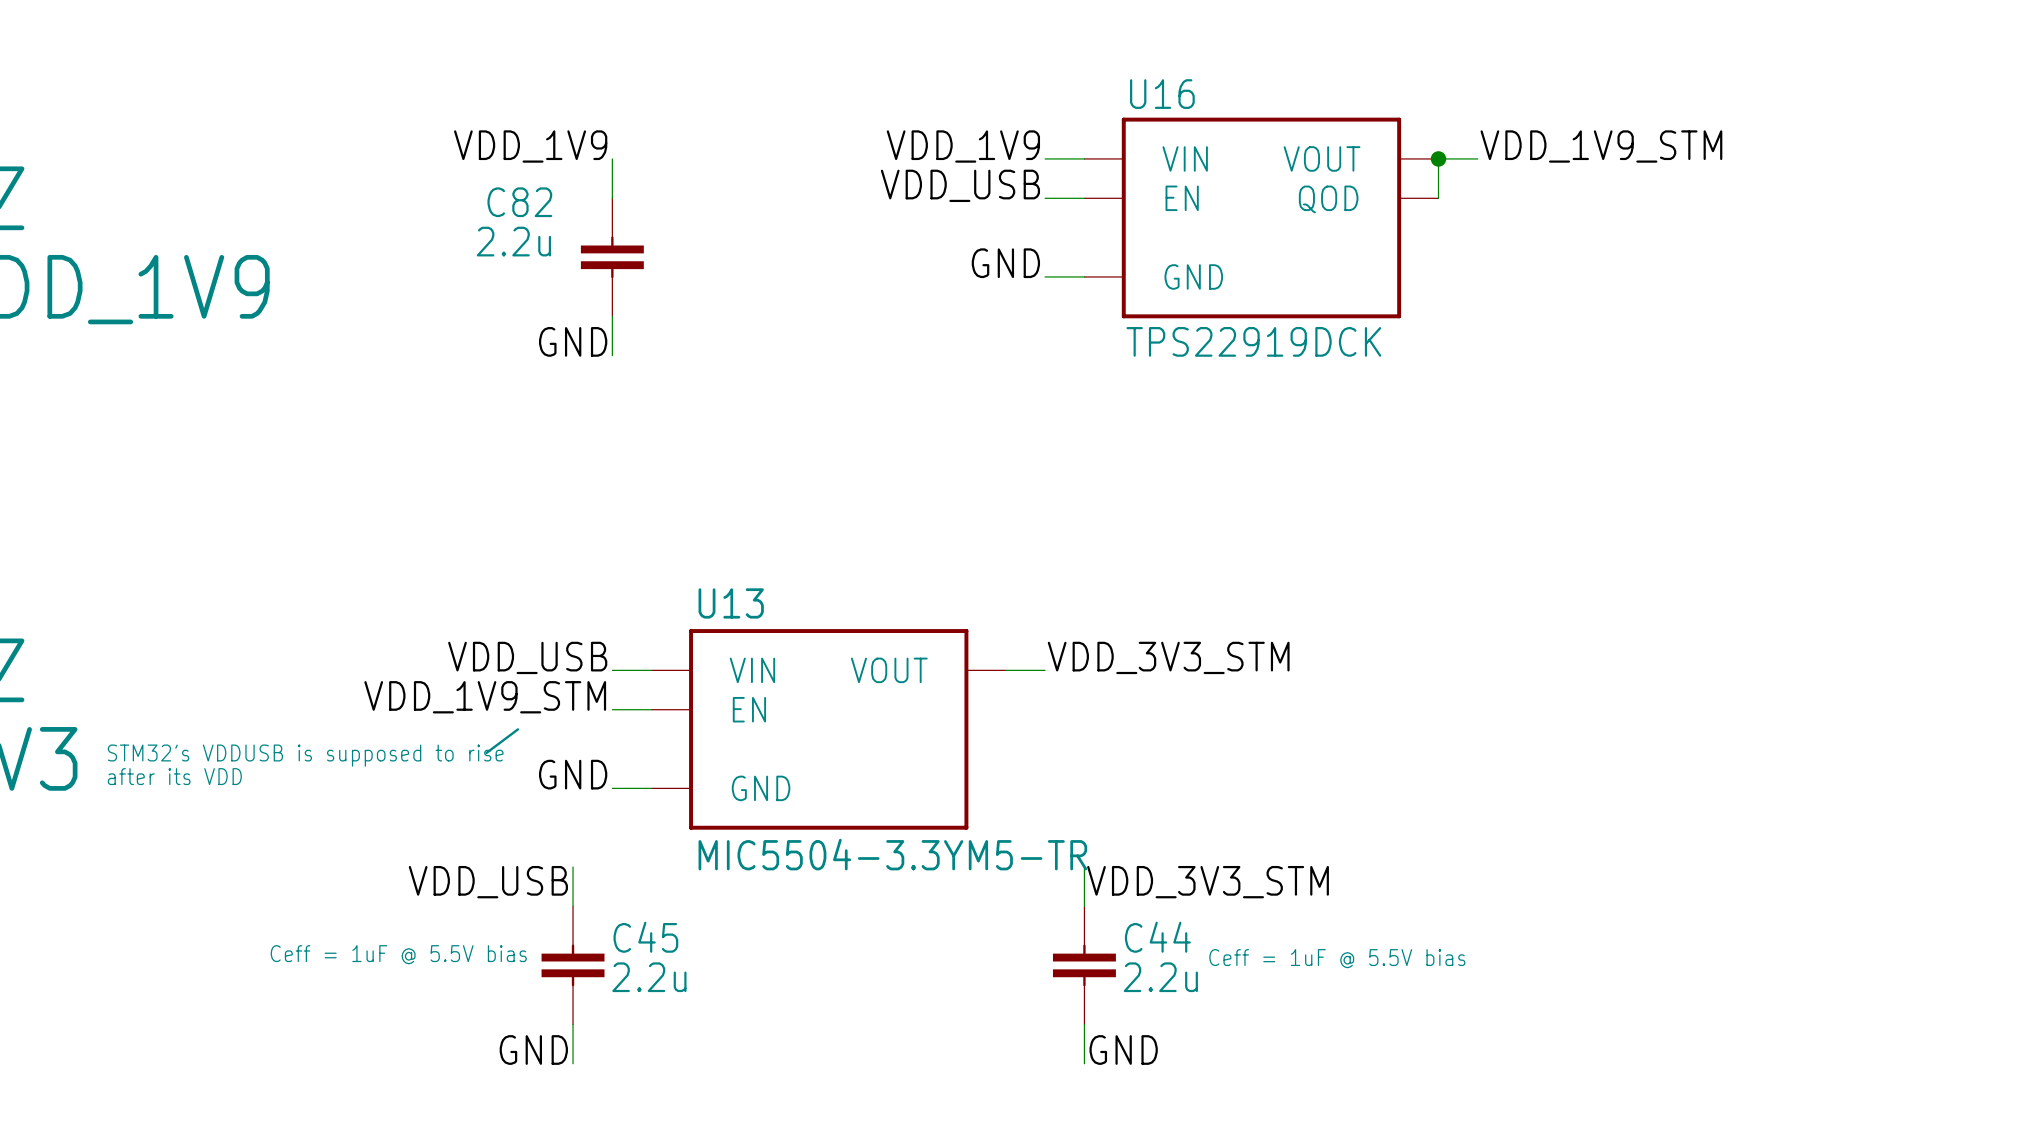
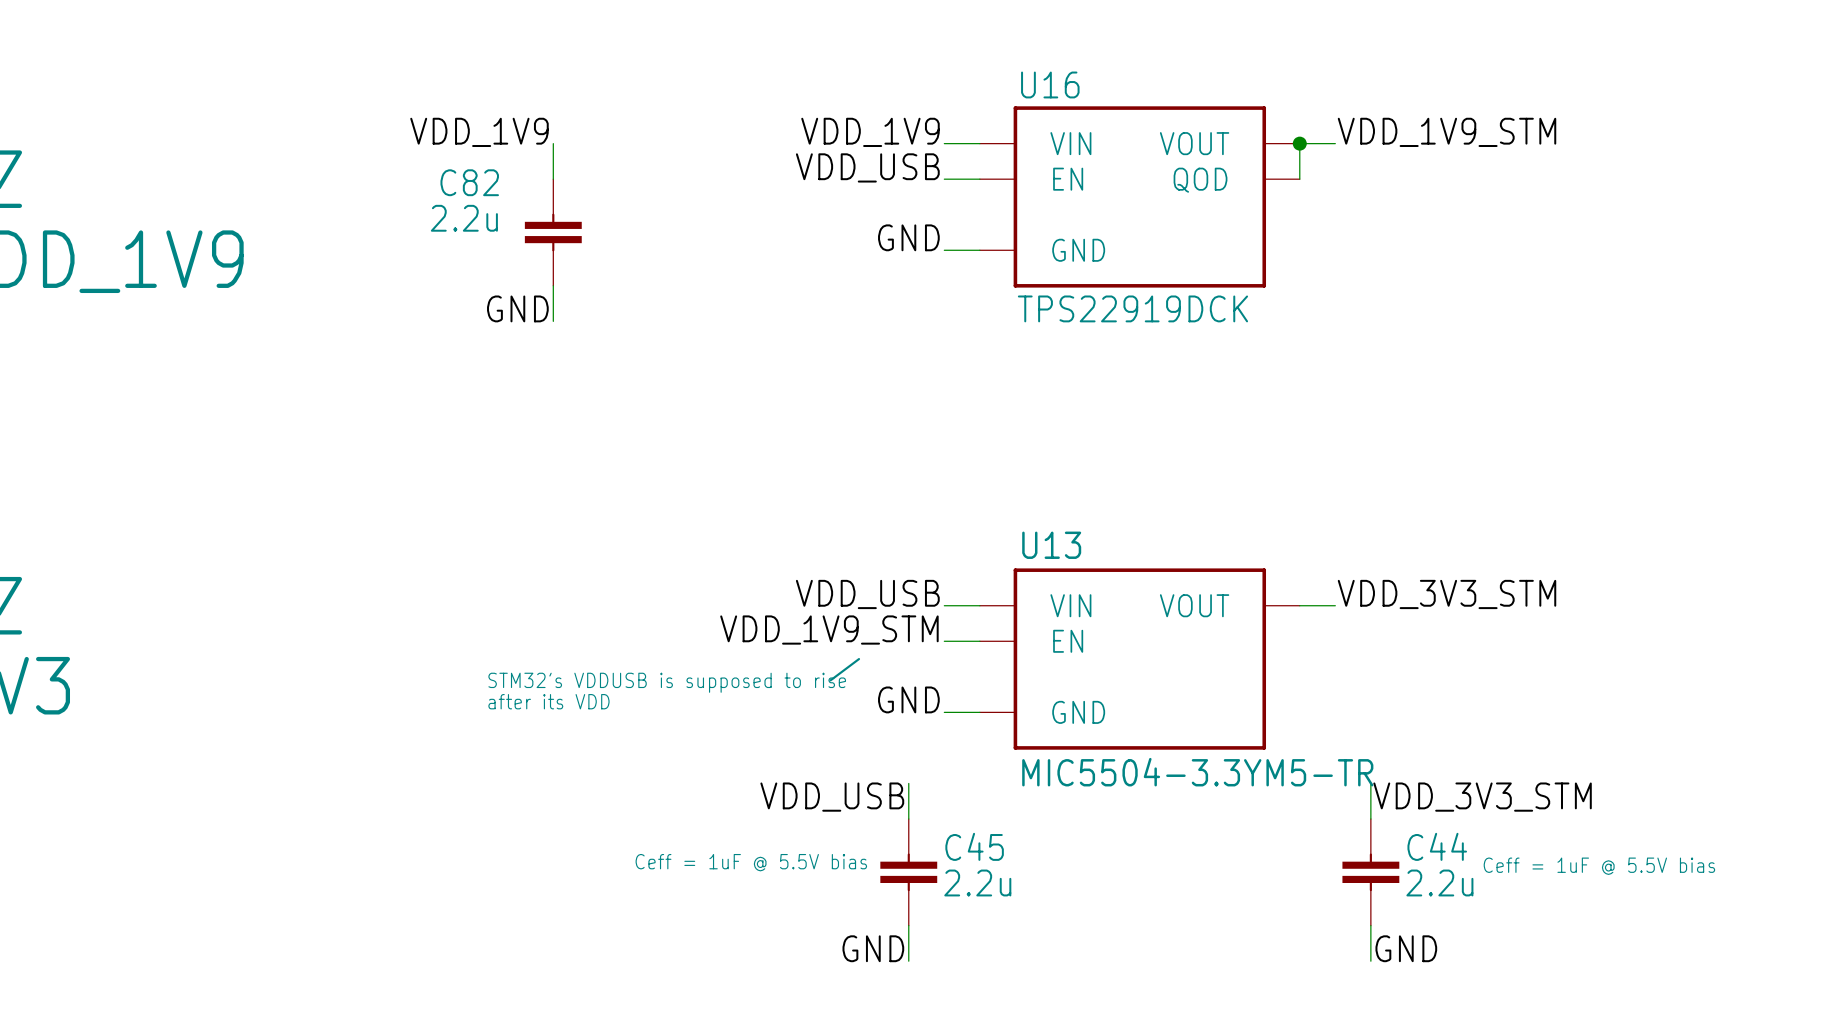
label: VDD_USB (527, 657) -> none
label: VDD_3V3_STM (1168, 657) -> VDD_USB (867, 594)
label: none -> VDD_3V3_STM (1447, 594)
wire: (612, 670) (651, 670) -> none
wire: (1005, 670) (1045, 670) -> (979, 605) (944, 605)
wire: none -> (1299, 605) (1335, 605)
label: VDD_1V9_STM (485, 697) -> none
label: none -> VDD_1V9_STM (829, 630)
wire: (612, 709) (651, 709) -> none
wire: none -> (944, 641) (979, 641)
line: (517, 729) (486, 752) -> none
U13 position: (828, 729) -> (1139, 659)
line: none -> (859, 659) (830, 680)
text: STM32's VDDUSB is supposed to rise (305, 755) -> none
text: none -> STM32's VDDUSB is supposed to rise (667, 682)
label: GND (573, 774) -> none
label: none -> GND (908, 699)
text: after its VDD (174, 776) -> none
text: none -> after its VDD (548, 701)
wire: (612, 788) (651, 788) -> none
wire: none -> (944, 712) (979, 712)
wire: (573, 867) (573, 906) -> none
wire: (1084, 867) (1084, 906) -> (908, 783) (908, 819)
wire: none -> (1370, 783) (1370, 819)
label: VDD_USB (488, 882) -> none
label: none -> VDD_USB (832, 797)
label: VDD_3V3_STM (1208, 882) -> none
label: none -> VDD_3V3_STM (1482, 797)
text: Ceff = 1uF @ 5.5V bias (398, 954) -> none
text: none -> Ceff = 1uF @ 5.5V bias (751, 862)
text: Ceff = 1uF @ 5.5V bias (1337, 958) -> none
text: none -> Ceff = 1uF @ 5.5V bias (1599, 866)
C45 position: (573, 965) -> (908, 872)
C44 position: (1084, 965) -> (1370, 872)
wire: (573, 1024) (573, 1063) -> none
wire: (1084, 1024) (1084, 1063) -> (908, 925) (908, 961)
wire: none -> (1370, 925) (1370, 961)
label: GND (533, 1050) -> none
label position: GND (1123, 1050) -> GND (873, 948)
label: none -> GND (1406, 948)

